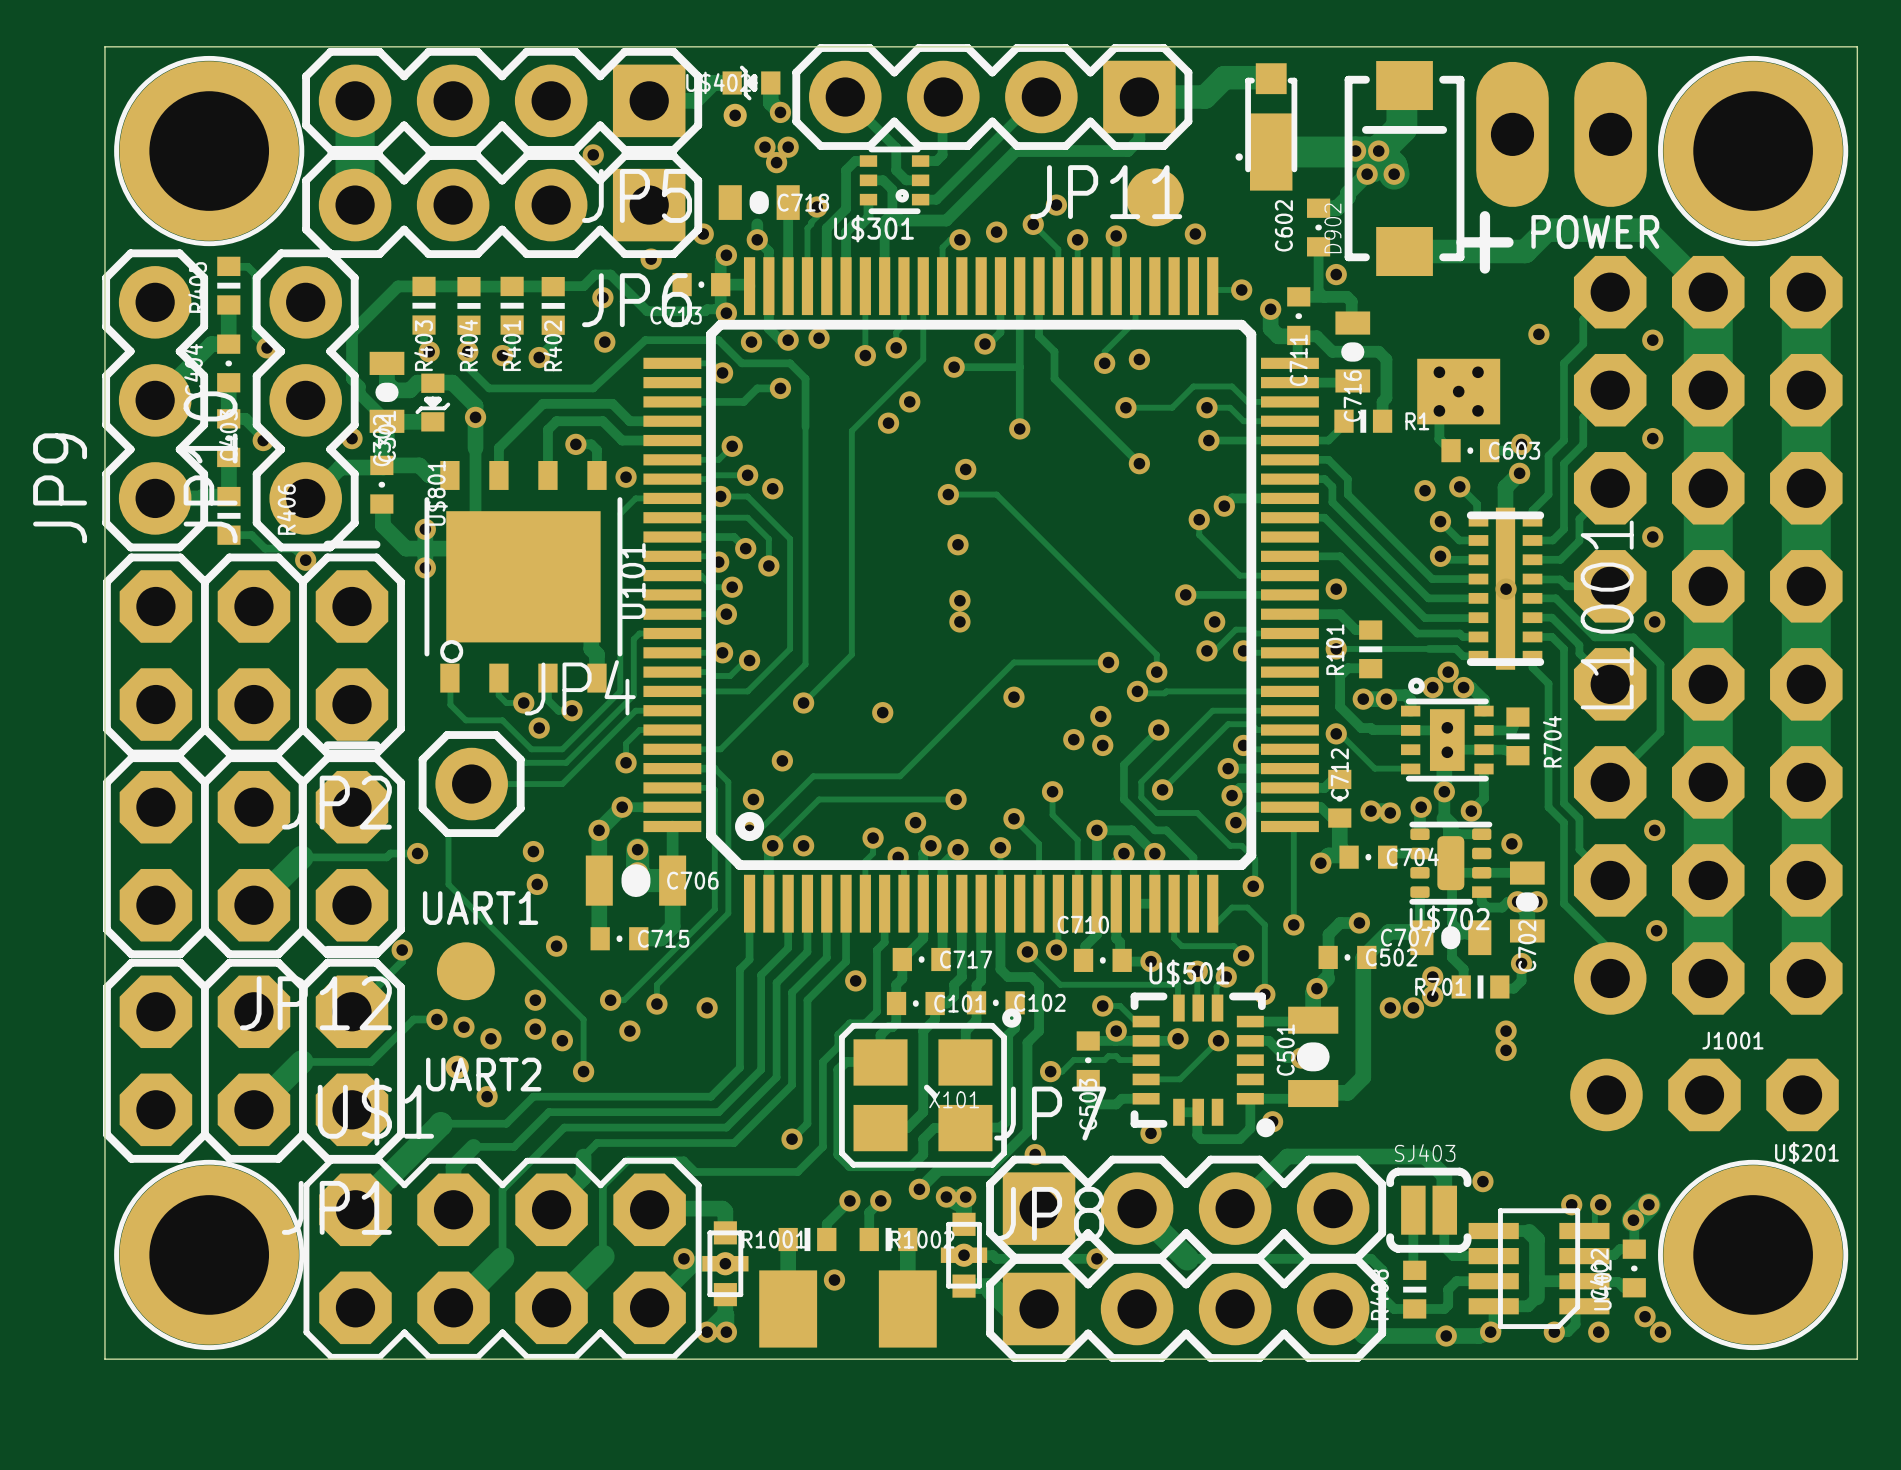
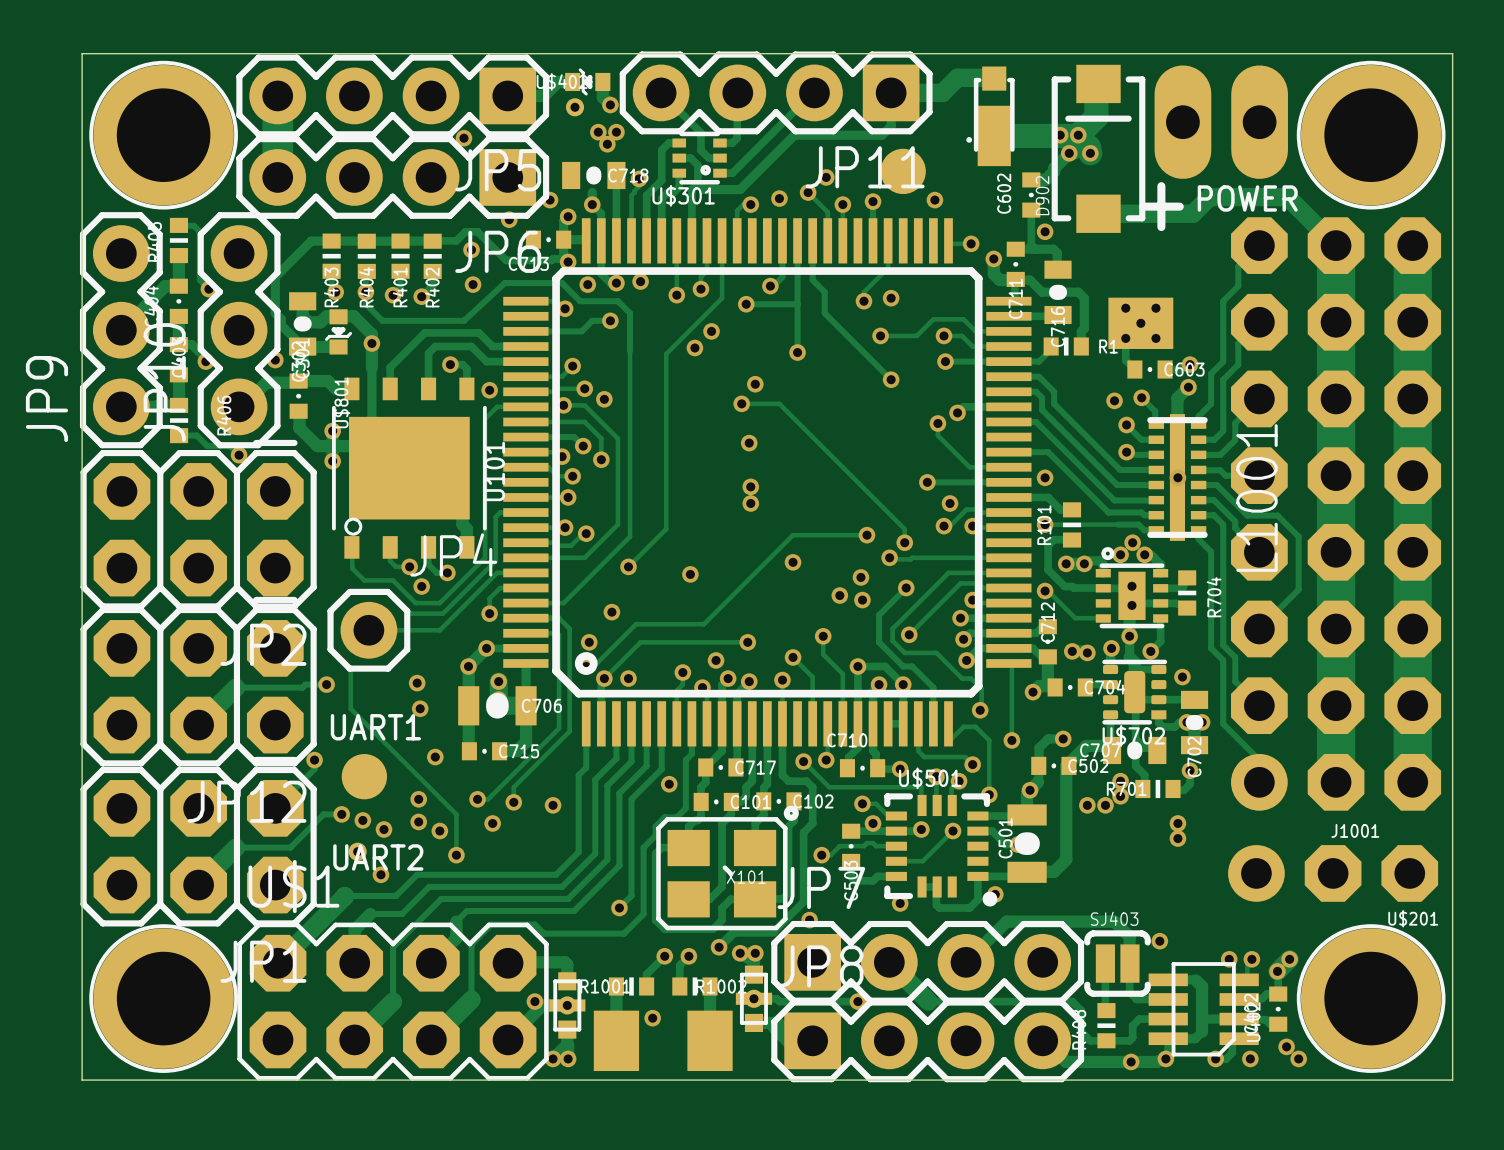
via: (1538, 334) -> none
via: (1652, 340) -> none
via: (1652, 438) -> none
via: (1652, 537) -> none
via: (1654, 621) -> none
via: (1654, 830) -> none
via: (1656, 930) -> none

